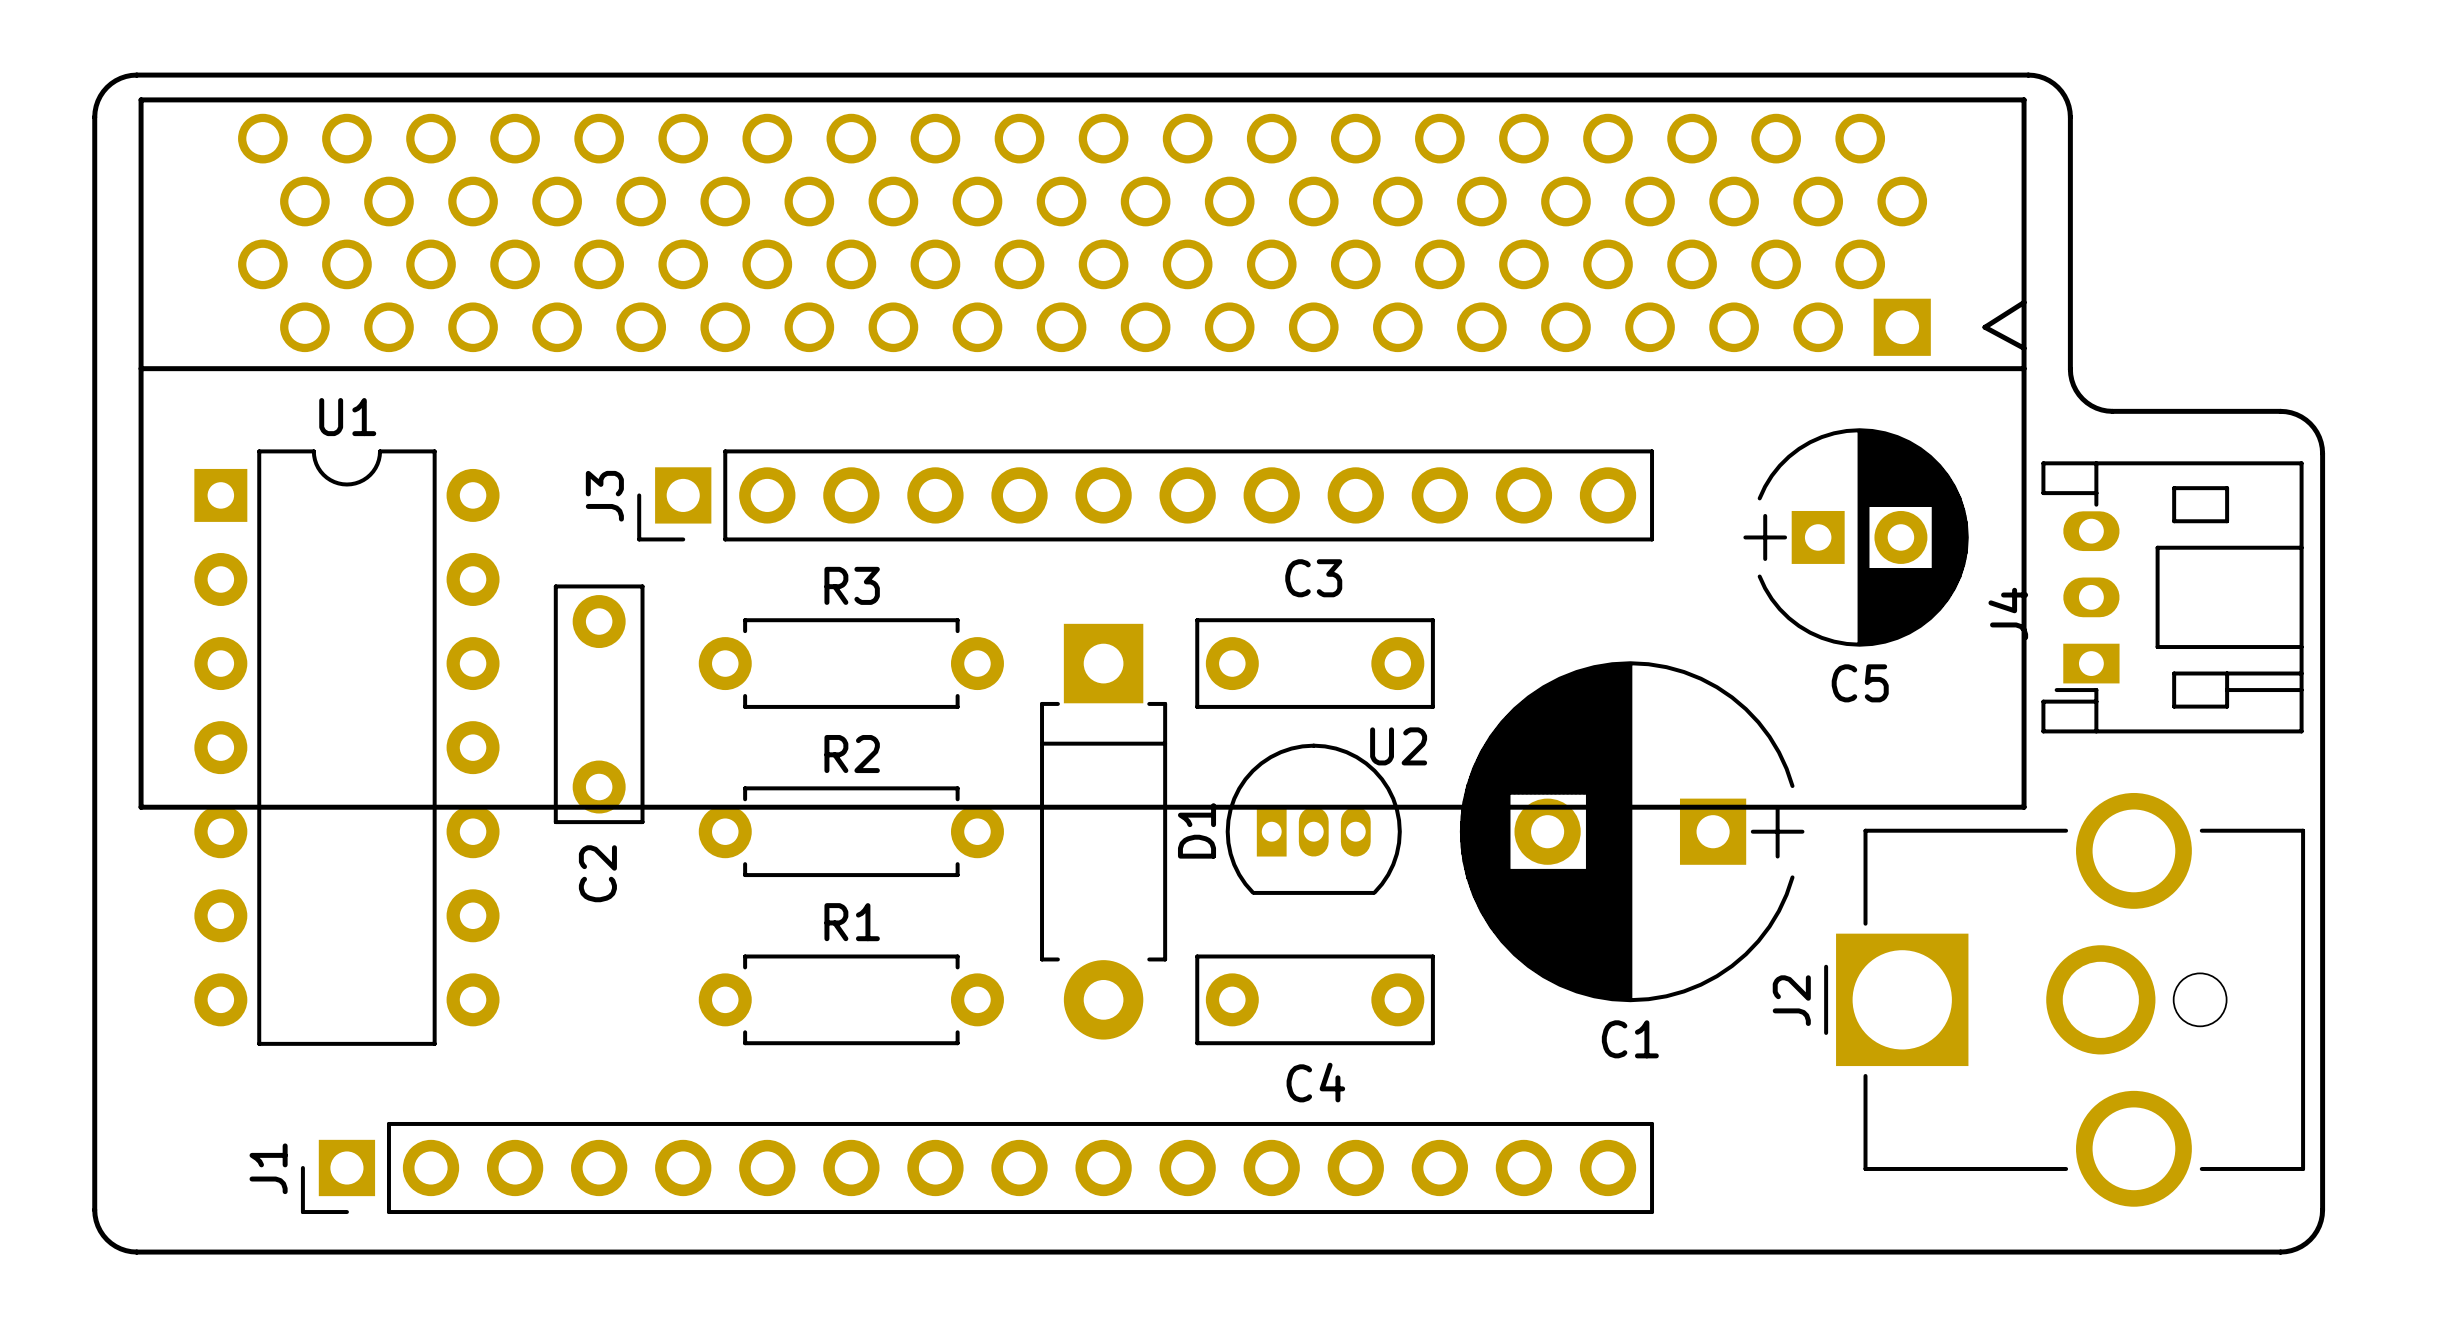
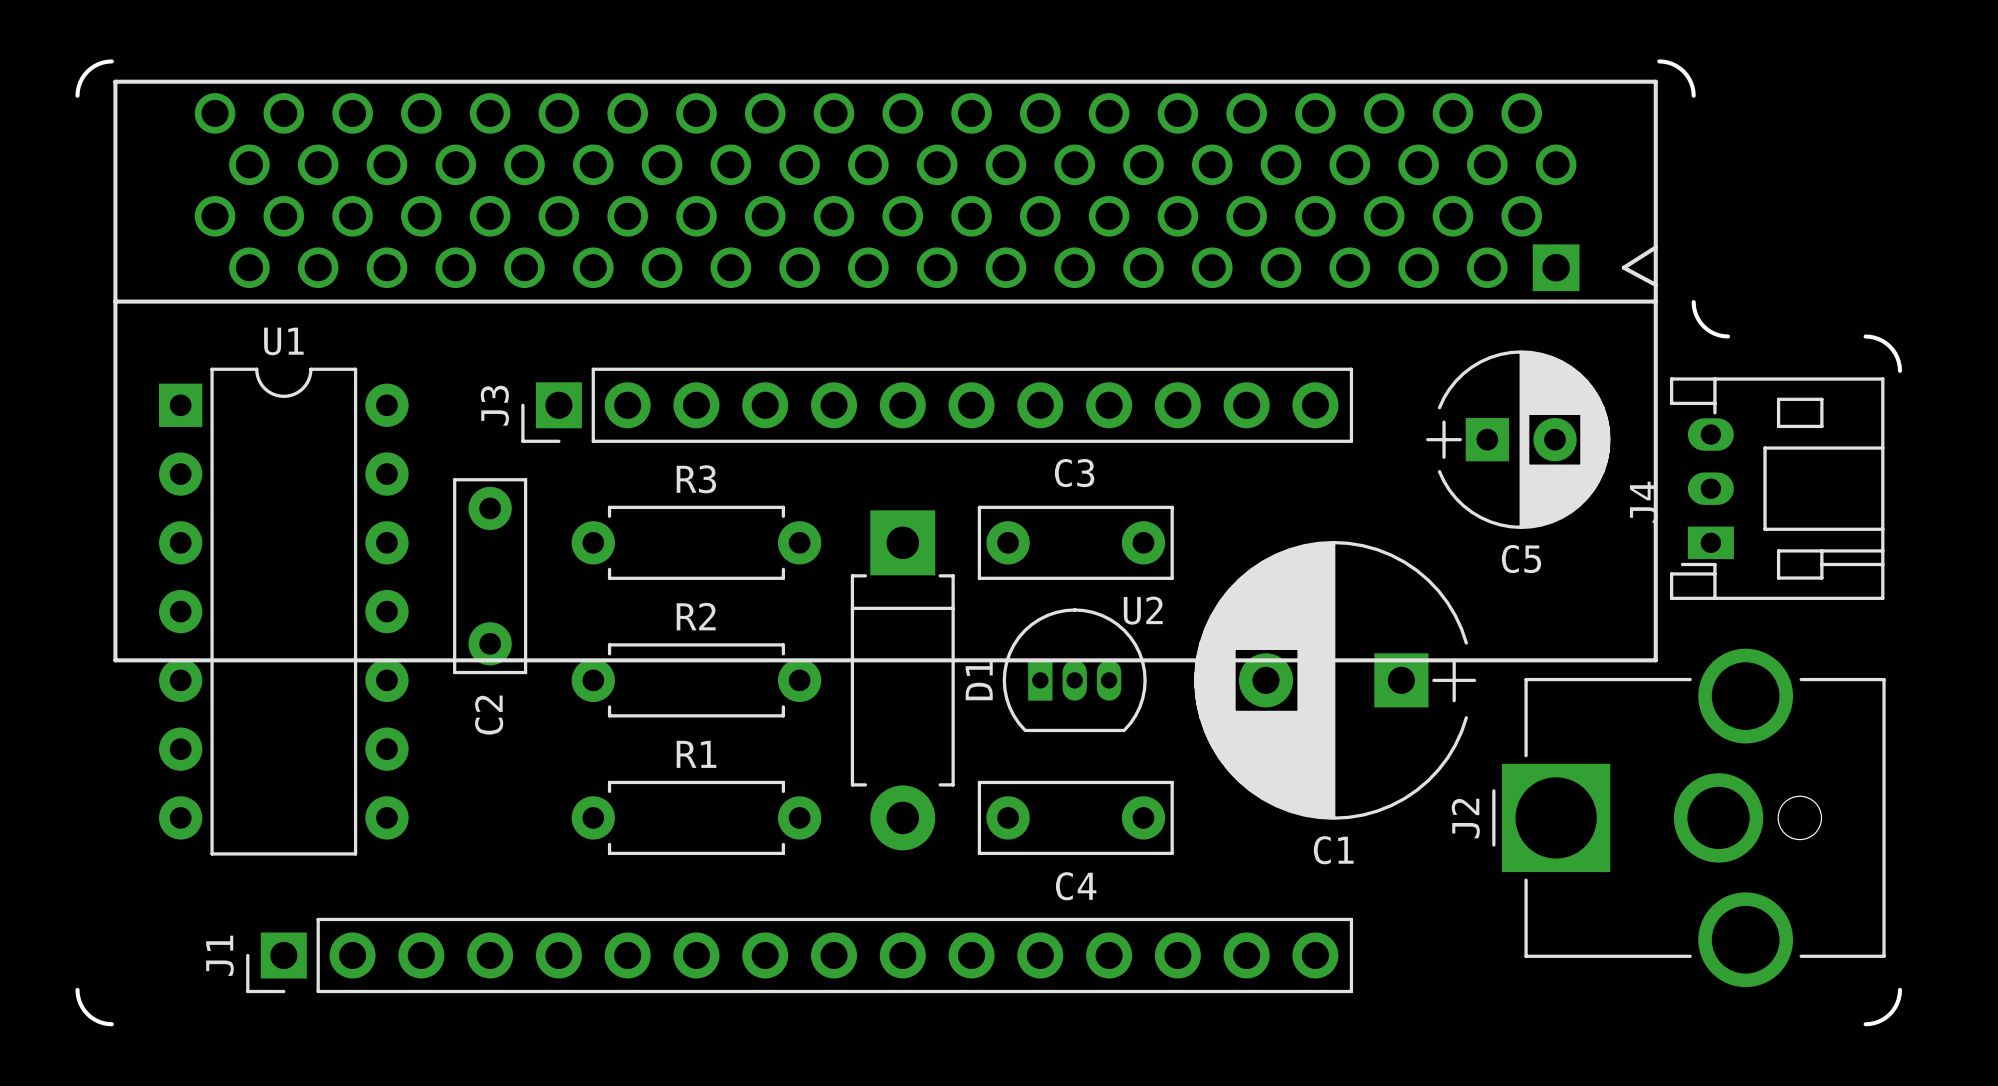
board edge: (136, 75) (2028, 75) -> none
board edge: (94, 117) (94, 1210) -> none
board edge: (2070, 117) (2070, 369) -> none
board edge: (2112, 411) (2280, 411) -> none
board edge: (2322, 453) (2322, 1210) -> none
board edge: (136, 1252) (2280, 1252) -> none

